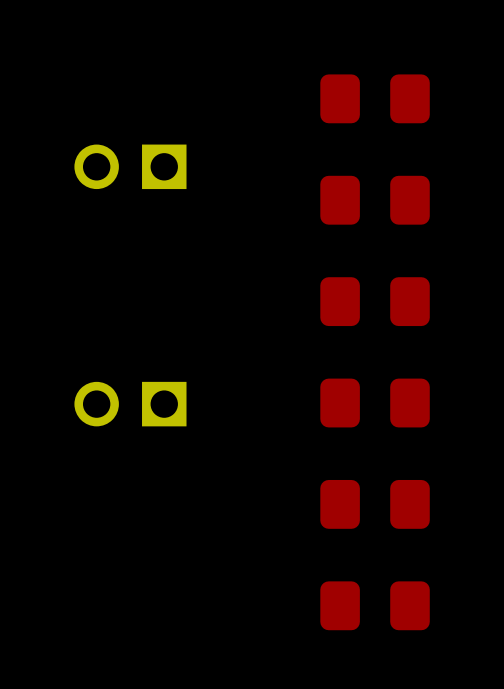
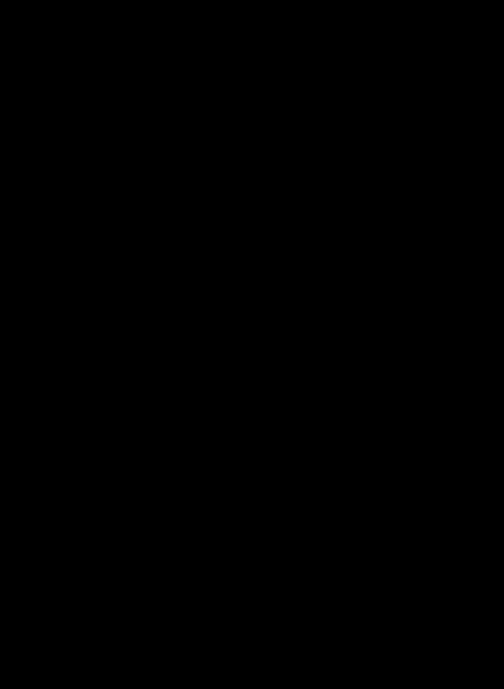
part: (375, 98) -> none
part: (130, 166) -> none
part: (375, 200) -> none
part: (375, 301) -> none
part: (375, 403) -> none
part: (130, 404) -> none
part: (375, 504) -> none
part: (375, 605) -> none

